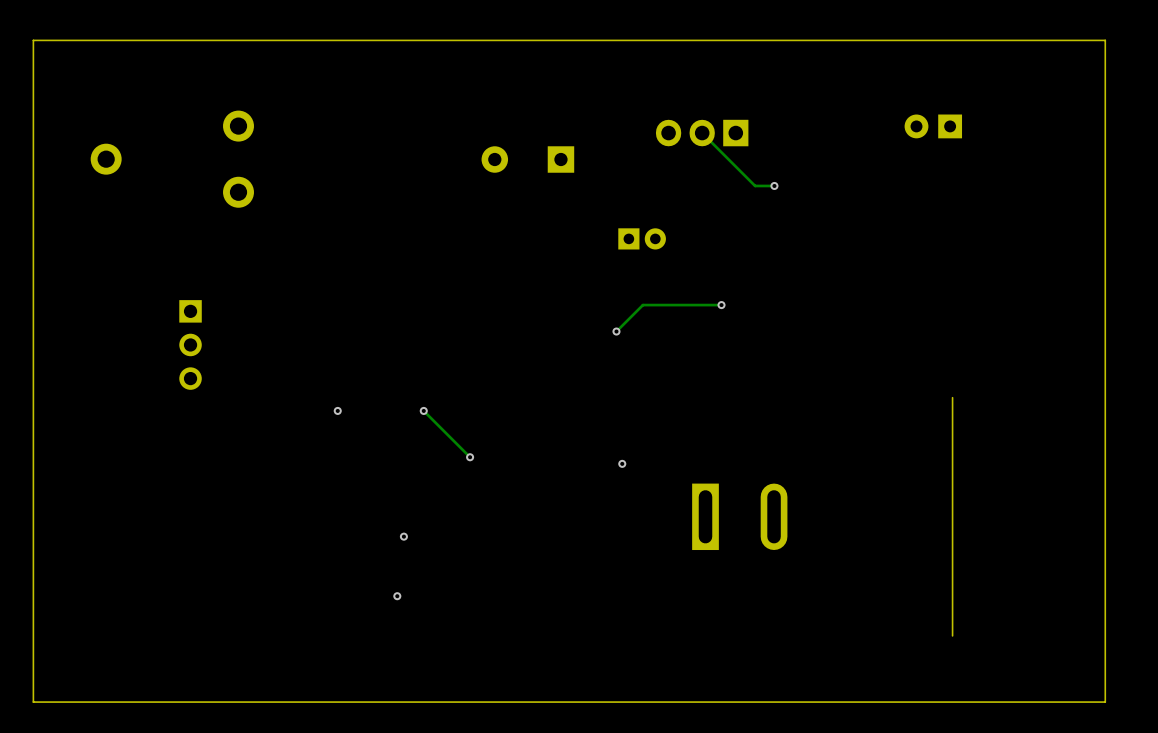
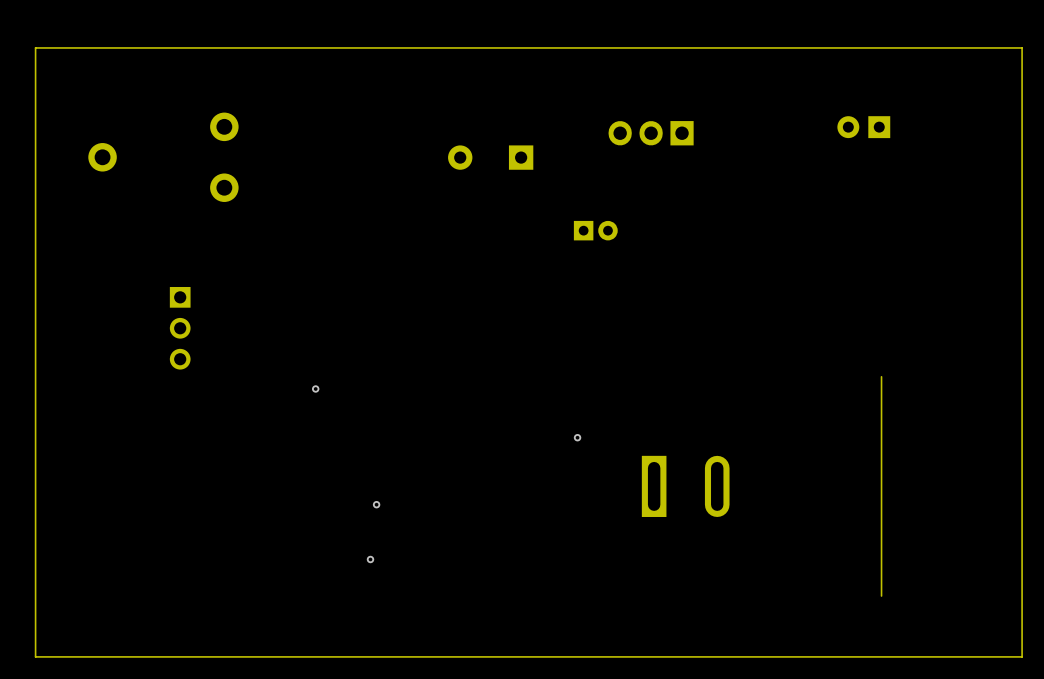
track: (702, 133) (755, 185) (774, 185) -> none
via: (774, 185) -> none
track: (721, 305) (642, 305) (616, 331) -> none
via: (721, 305) -> none
via: (616, 331) -> none
track: (423, 410) (470, 457) -> none
via: (423, 410) -> none
via: (470, 457) -> none

